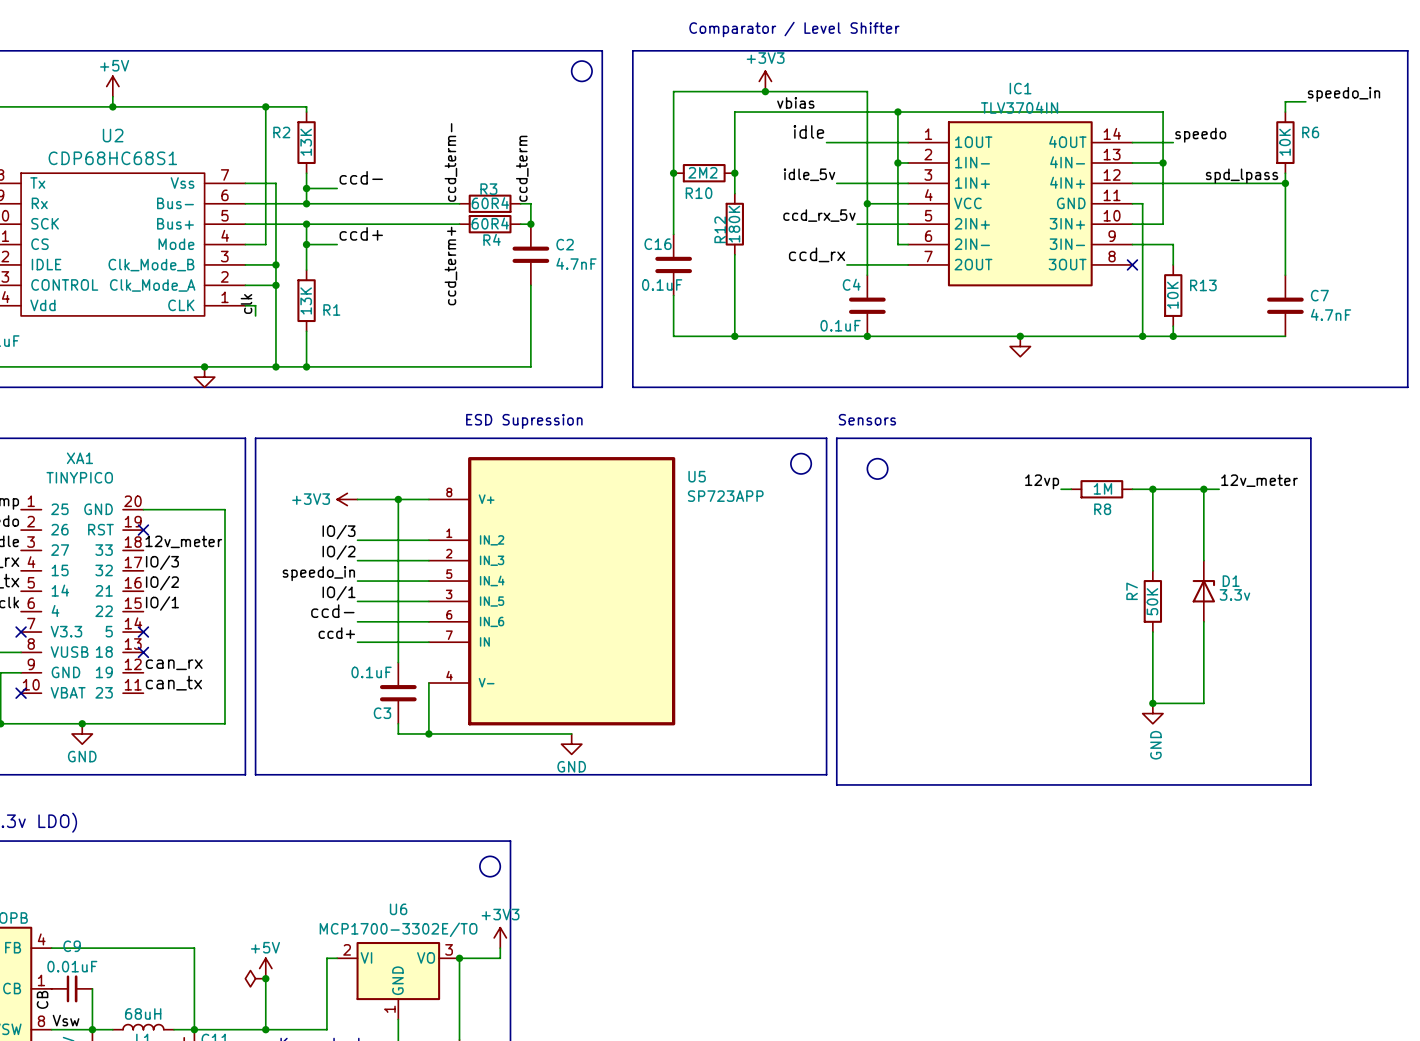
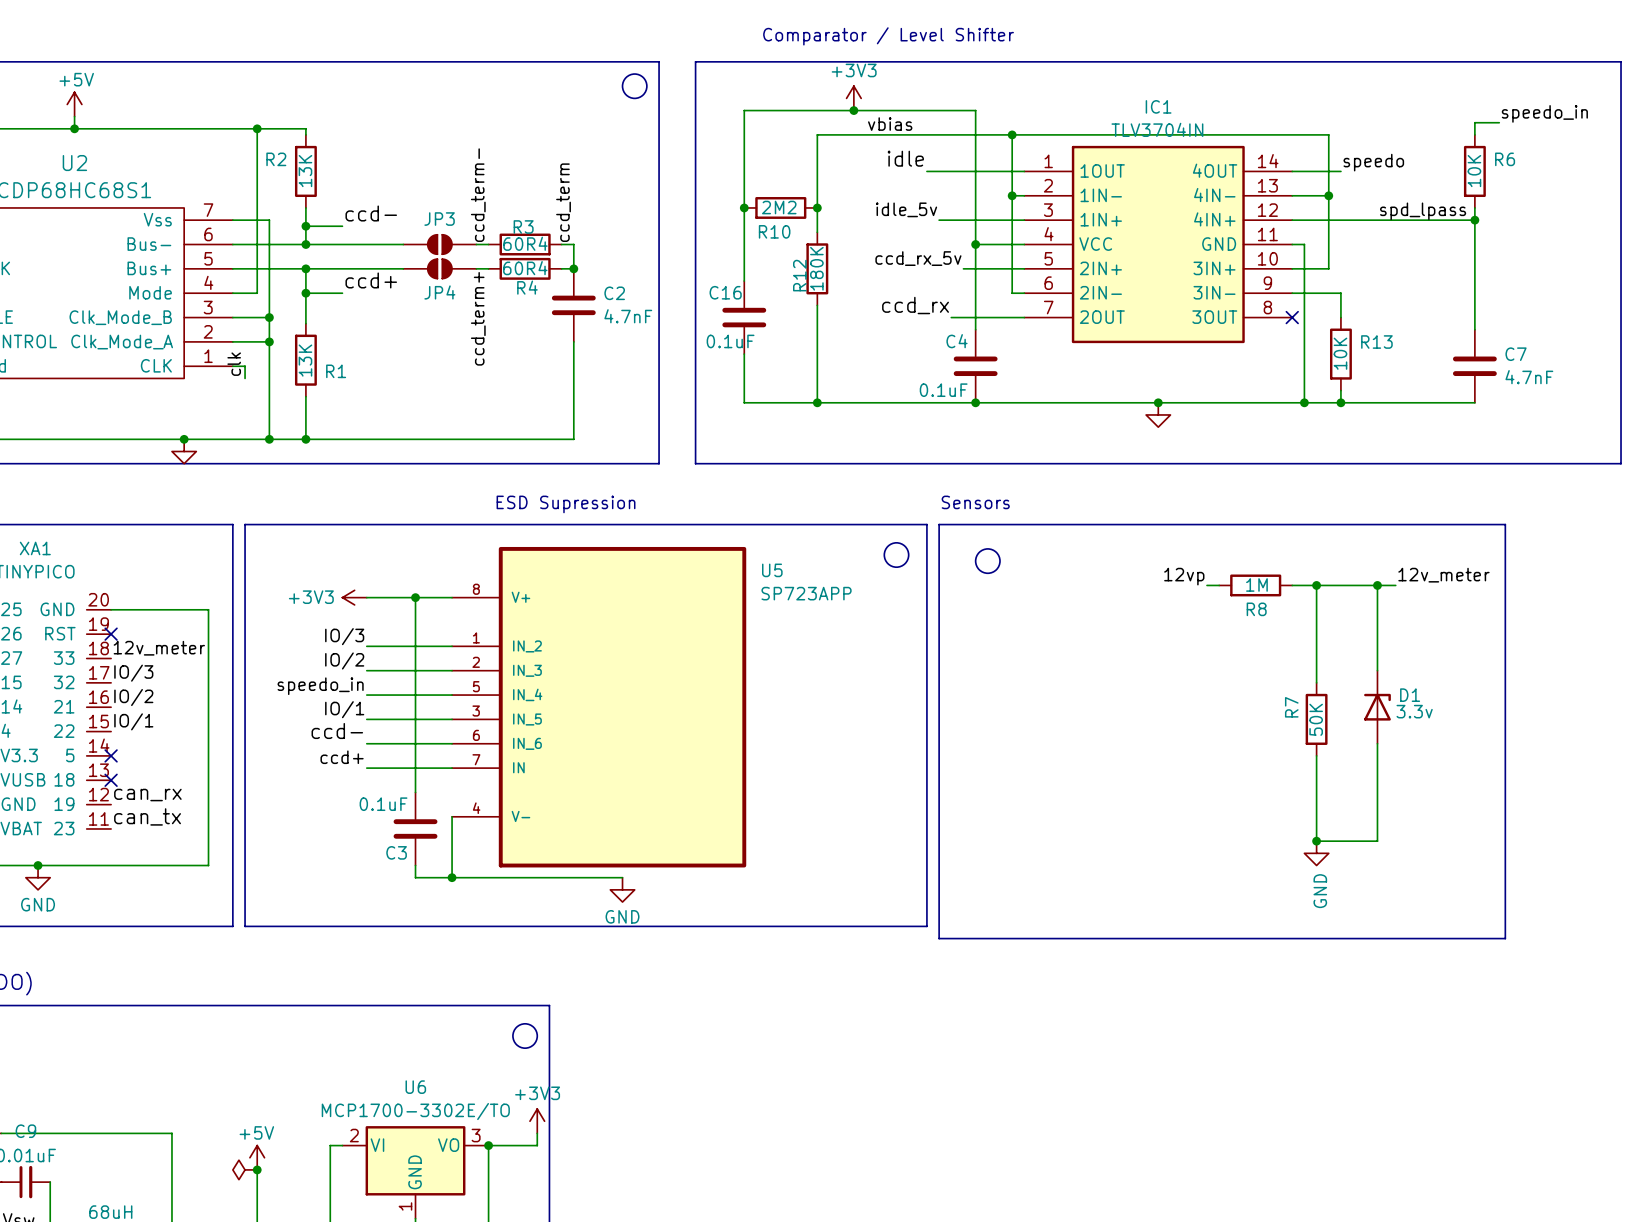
JP3: none -> (439, 244)
JP4: none -> (439, 268)

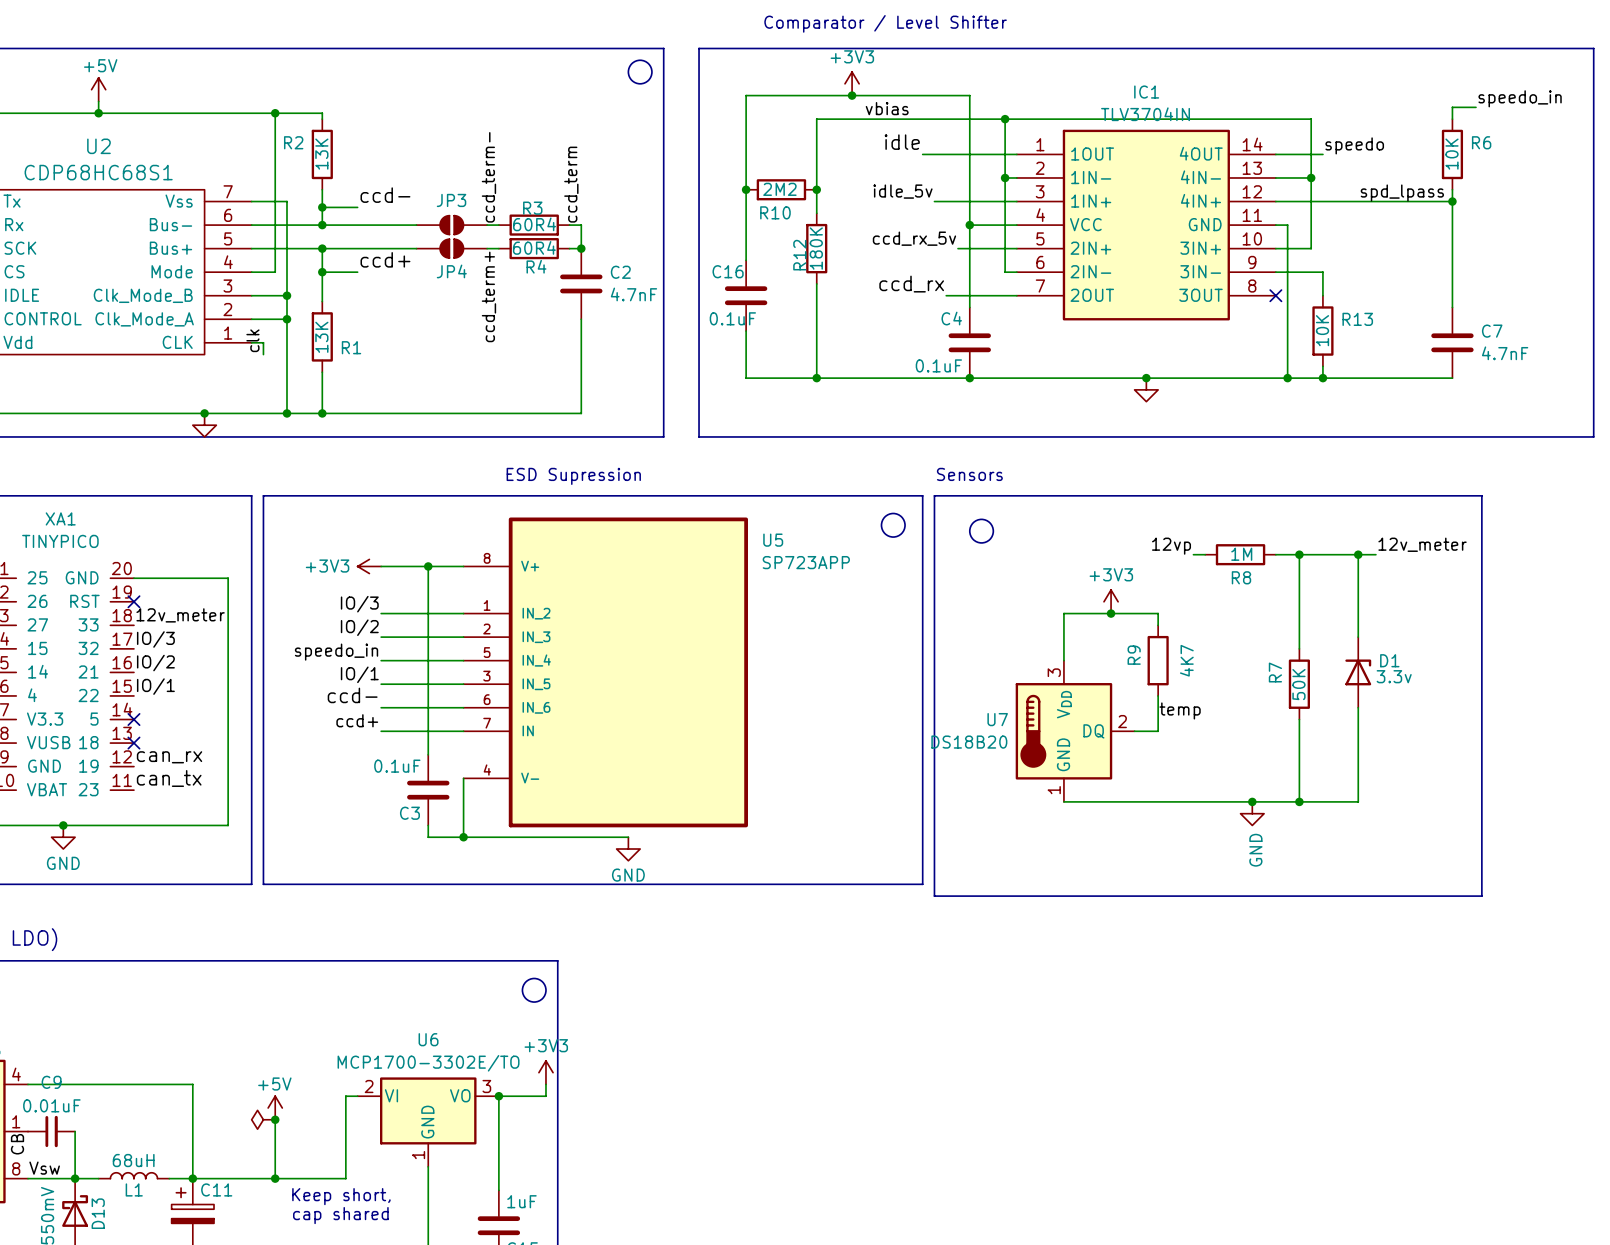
power symbol: none -> +3V3 (1111, 601)
junction: none -> (1111, 613)
wire: none -> (1158, 625) (1158, 613) (1063, 613) (1063, 660)
R9: none -> 4K7 (1158, 660)
wire: none -> (1158, 695) (1158, 731) (1134, 731)
label: none -> temp (1180, 710)
U7: none -> DS18B20 (1075, 731)
wire: none -> (1063, 801) (1299, 801)
junction: none -> (1252, 801)
power symbol position: GND (1316, 853) -> GND (1252, 813)

